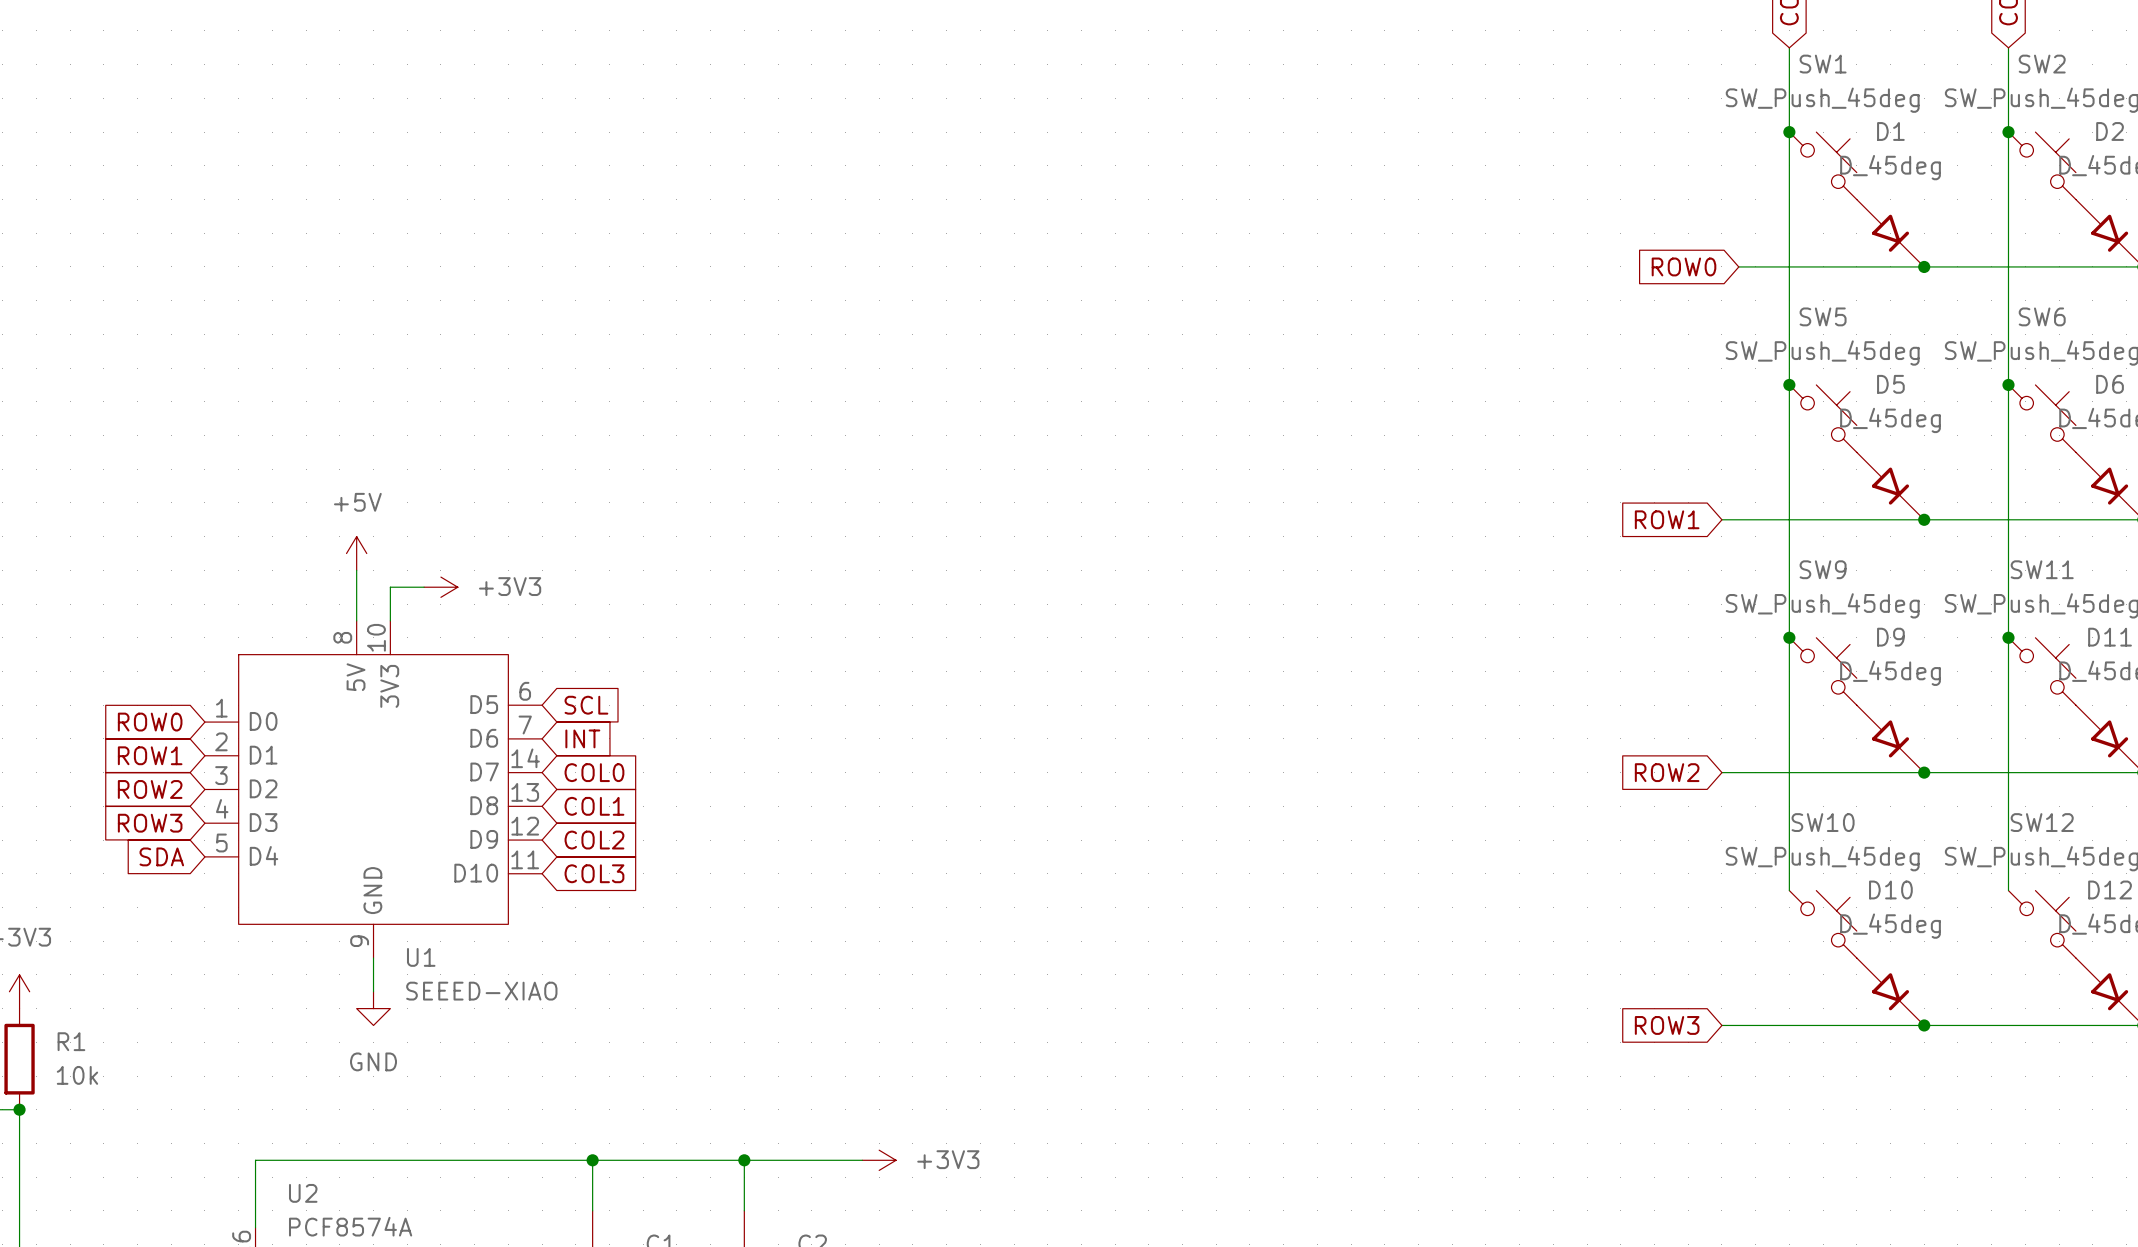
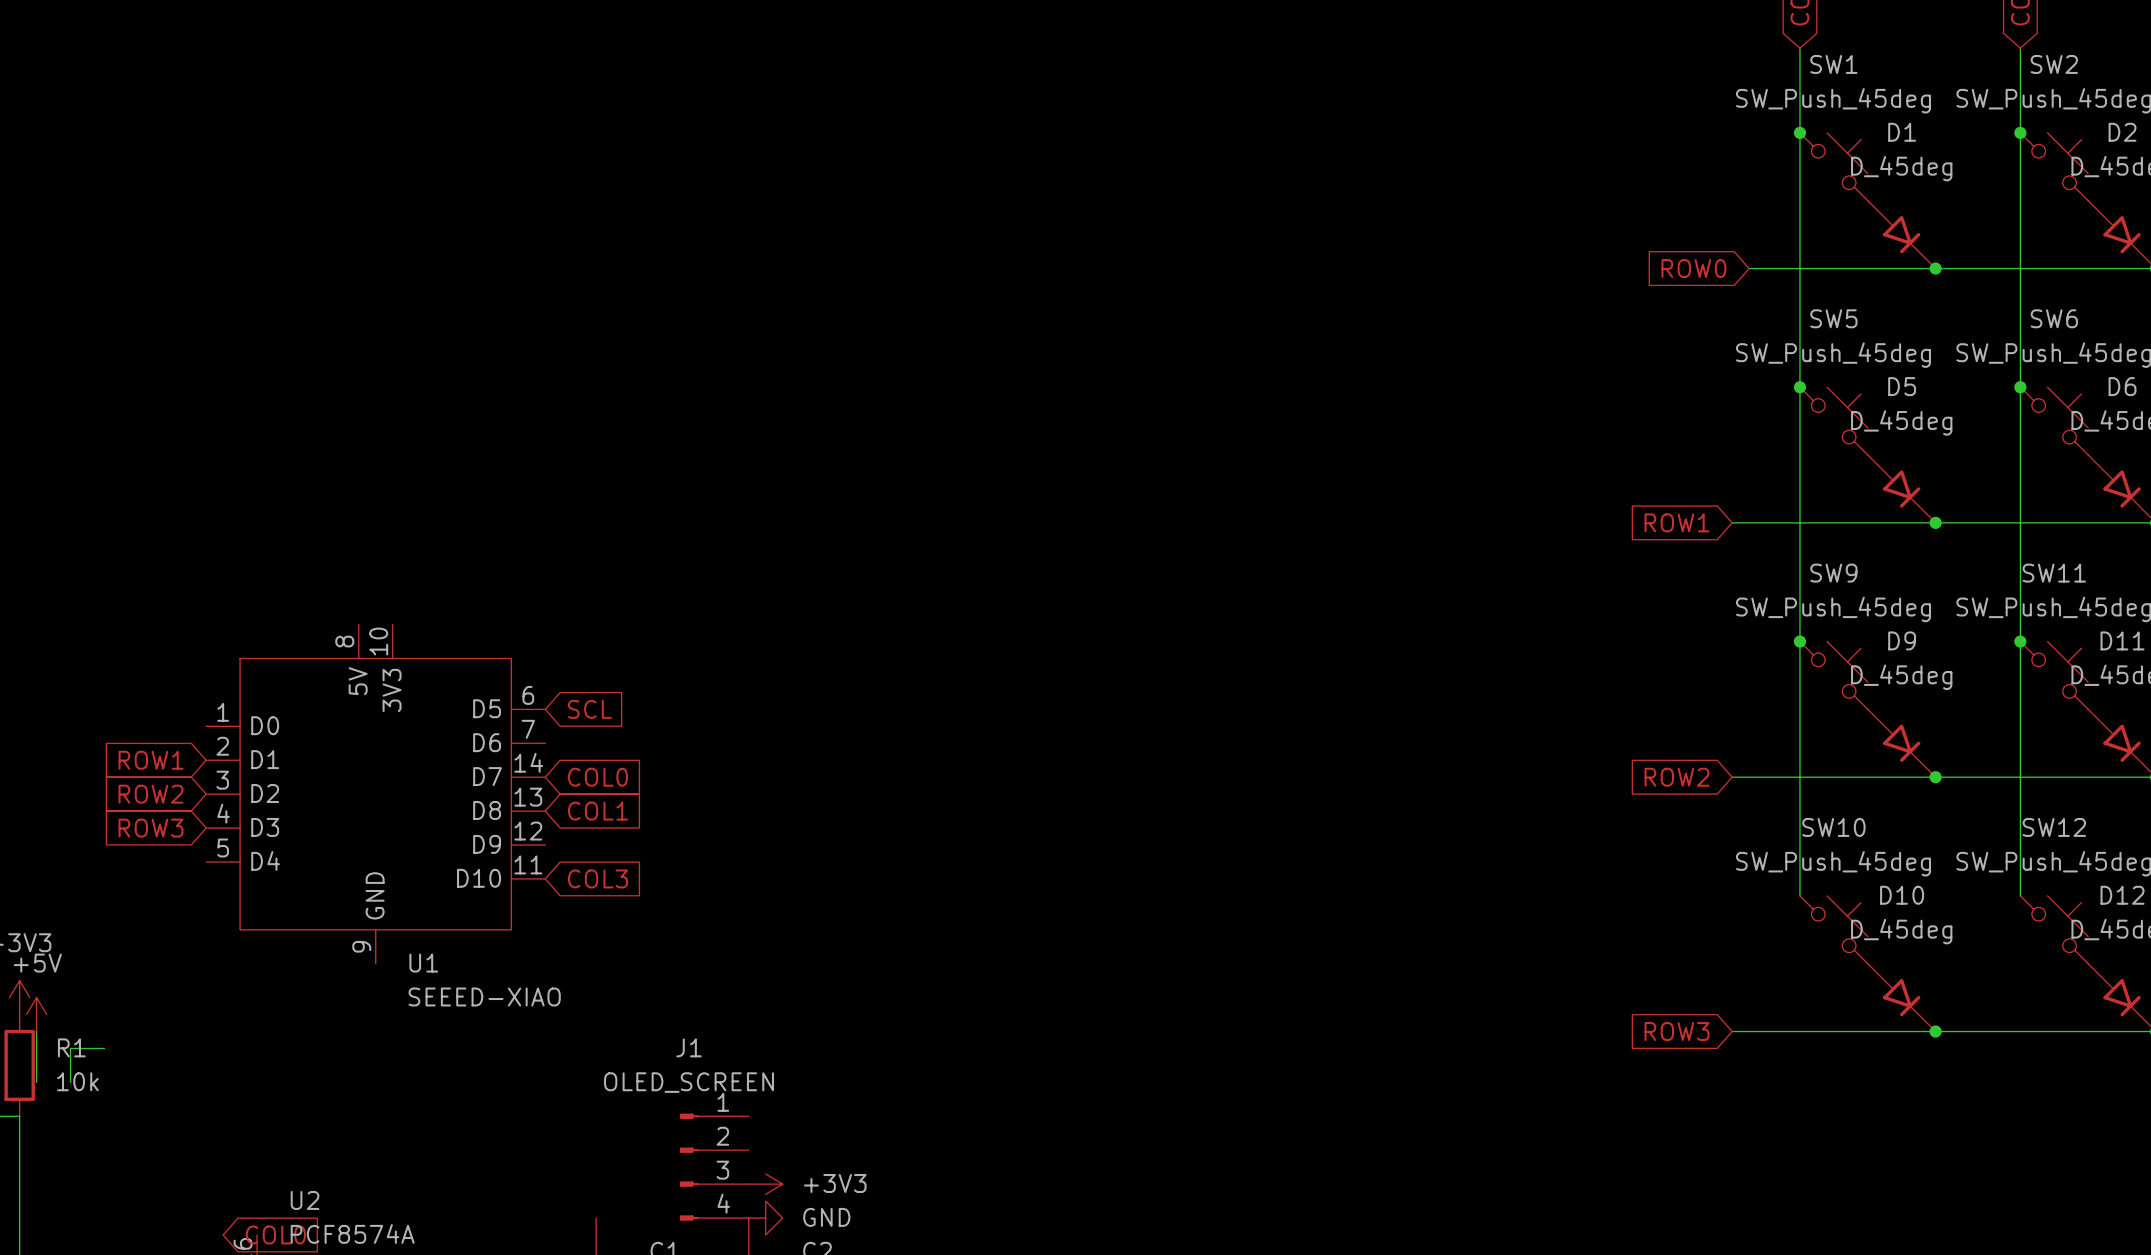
power symbol: +5V (356, 553) -> none
wire: (356, 570) (356, 620) -> none
wire: (424, 587) (390, 587) (390, 620) -> none
power symbol: +3V3 (440, 587) -> none
global label: ROW0 (150, 722) -> none
global label: INT (582, 738) -> none
global label: COL2 (594, 840) -> none
global label: SDA (161, 856) -> none
wire: (373, 958) (373, 991) -> none
power symbol: none -> +5V (36, 1014)
power symbol: GND (373, 1008) -> none
wire: none -> (36, 1031) (36, 1082)
wire: none -> (104, 1048) (70, 1048) (70, 1082)
junction: (19, 1109) -> none
wire: (592, 1160) (592, 1210) -> none
junction: (592, 1160) -> none
J1: none -> OLED_SCREEN (714, 1167)
wire: (744, 1160) (744, 1210) -> none
junction: (744, 1160) -> none
wire: (862, 1160) (255, 1160) (255, 1227) -> none
power symbol position: +3V3 (879, 1160) -> +3V3 (765, 1184)
power symbol: none -> GND (765, 1218)
global label: none -> COL0 (275, 1234)

